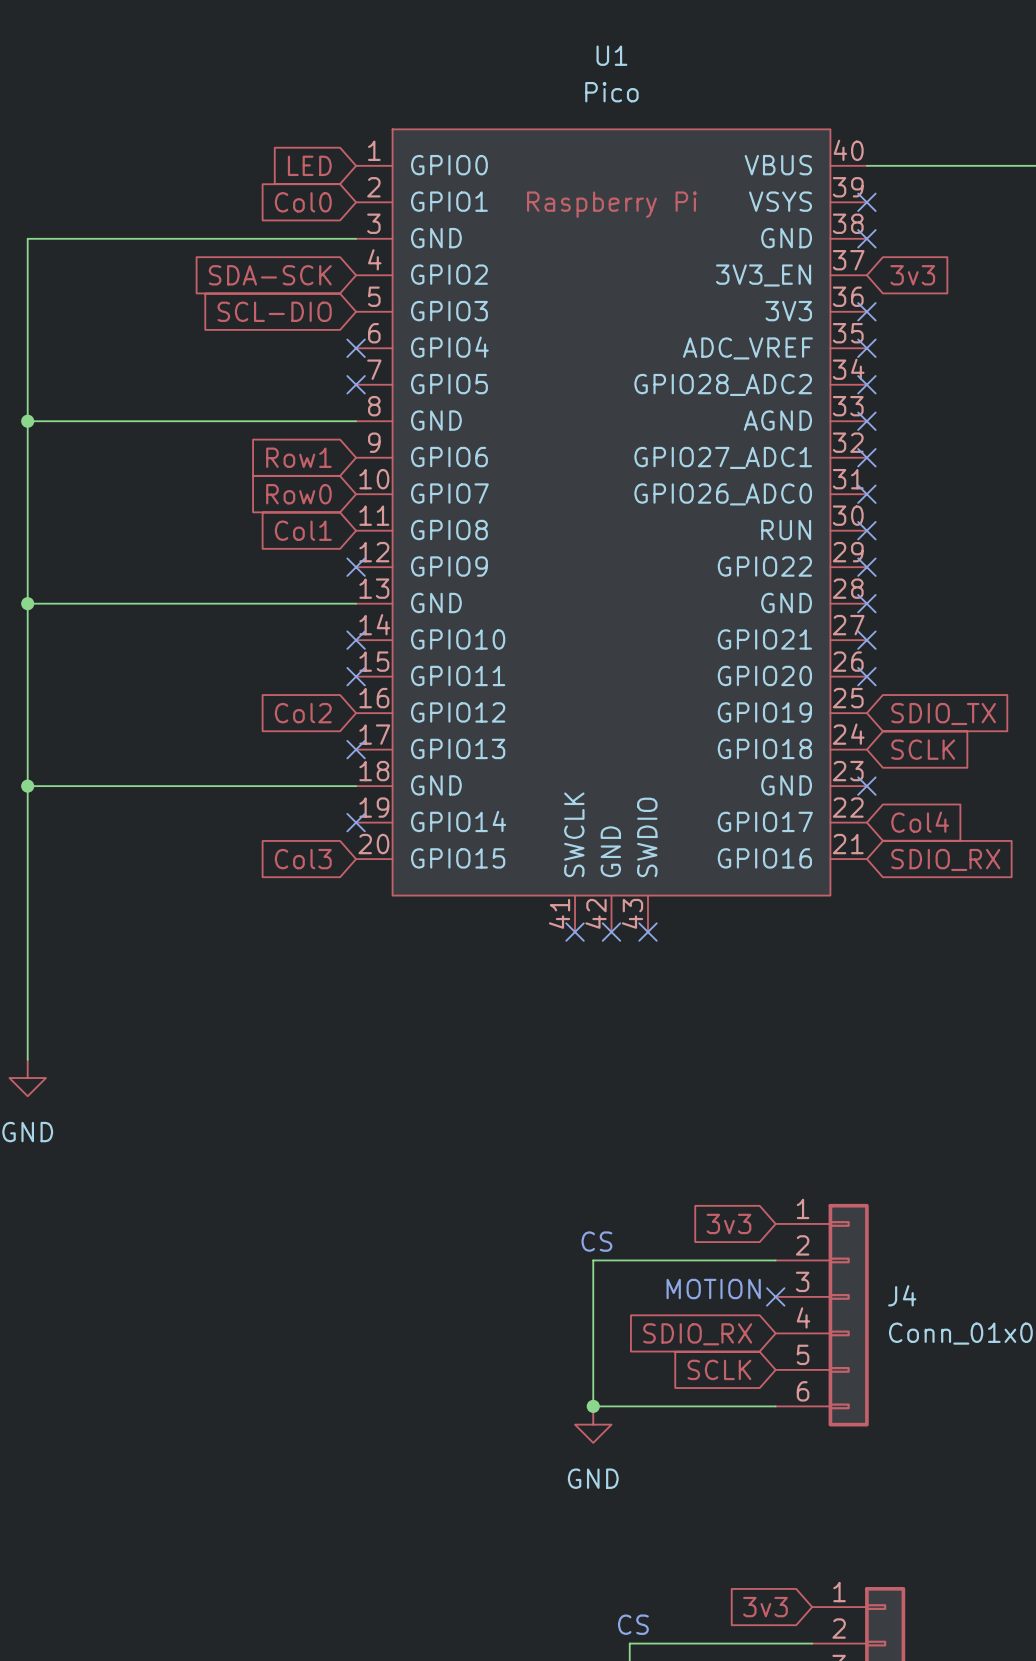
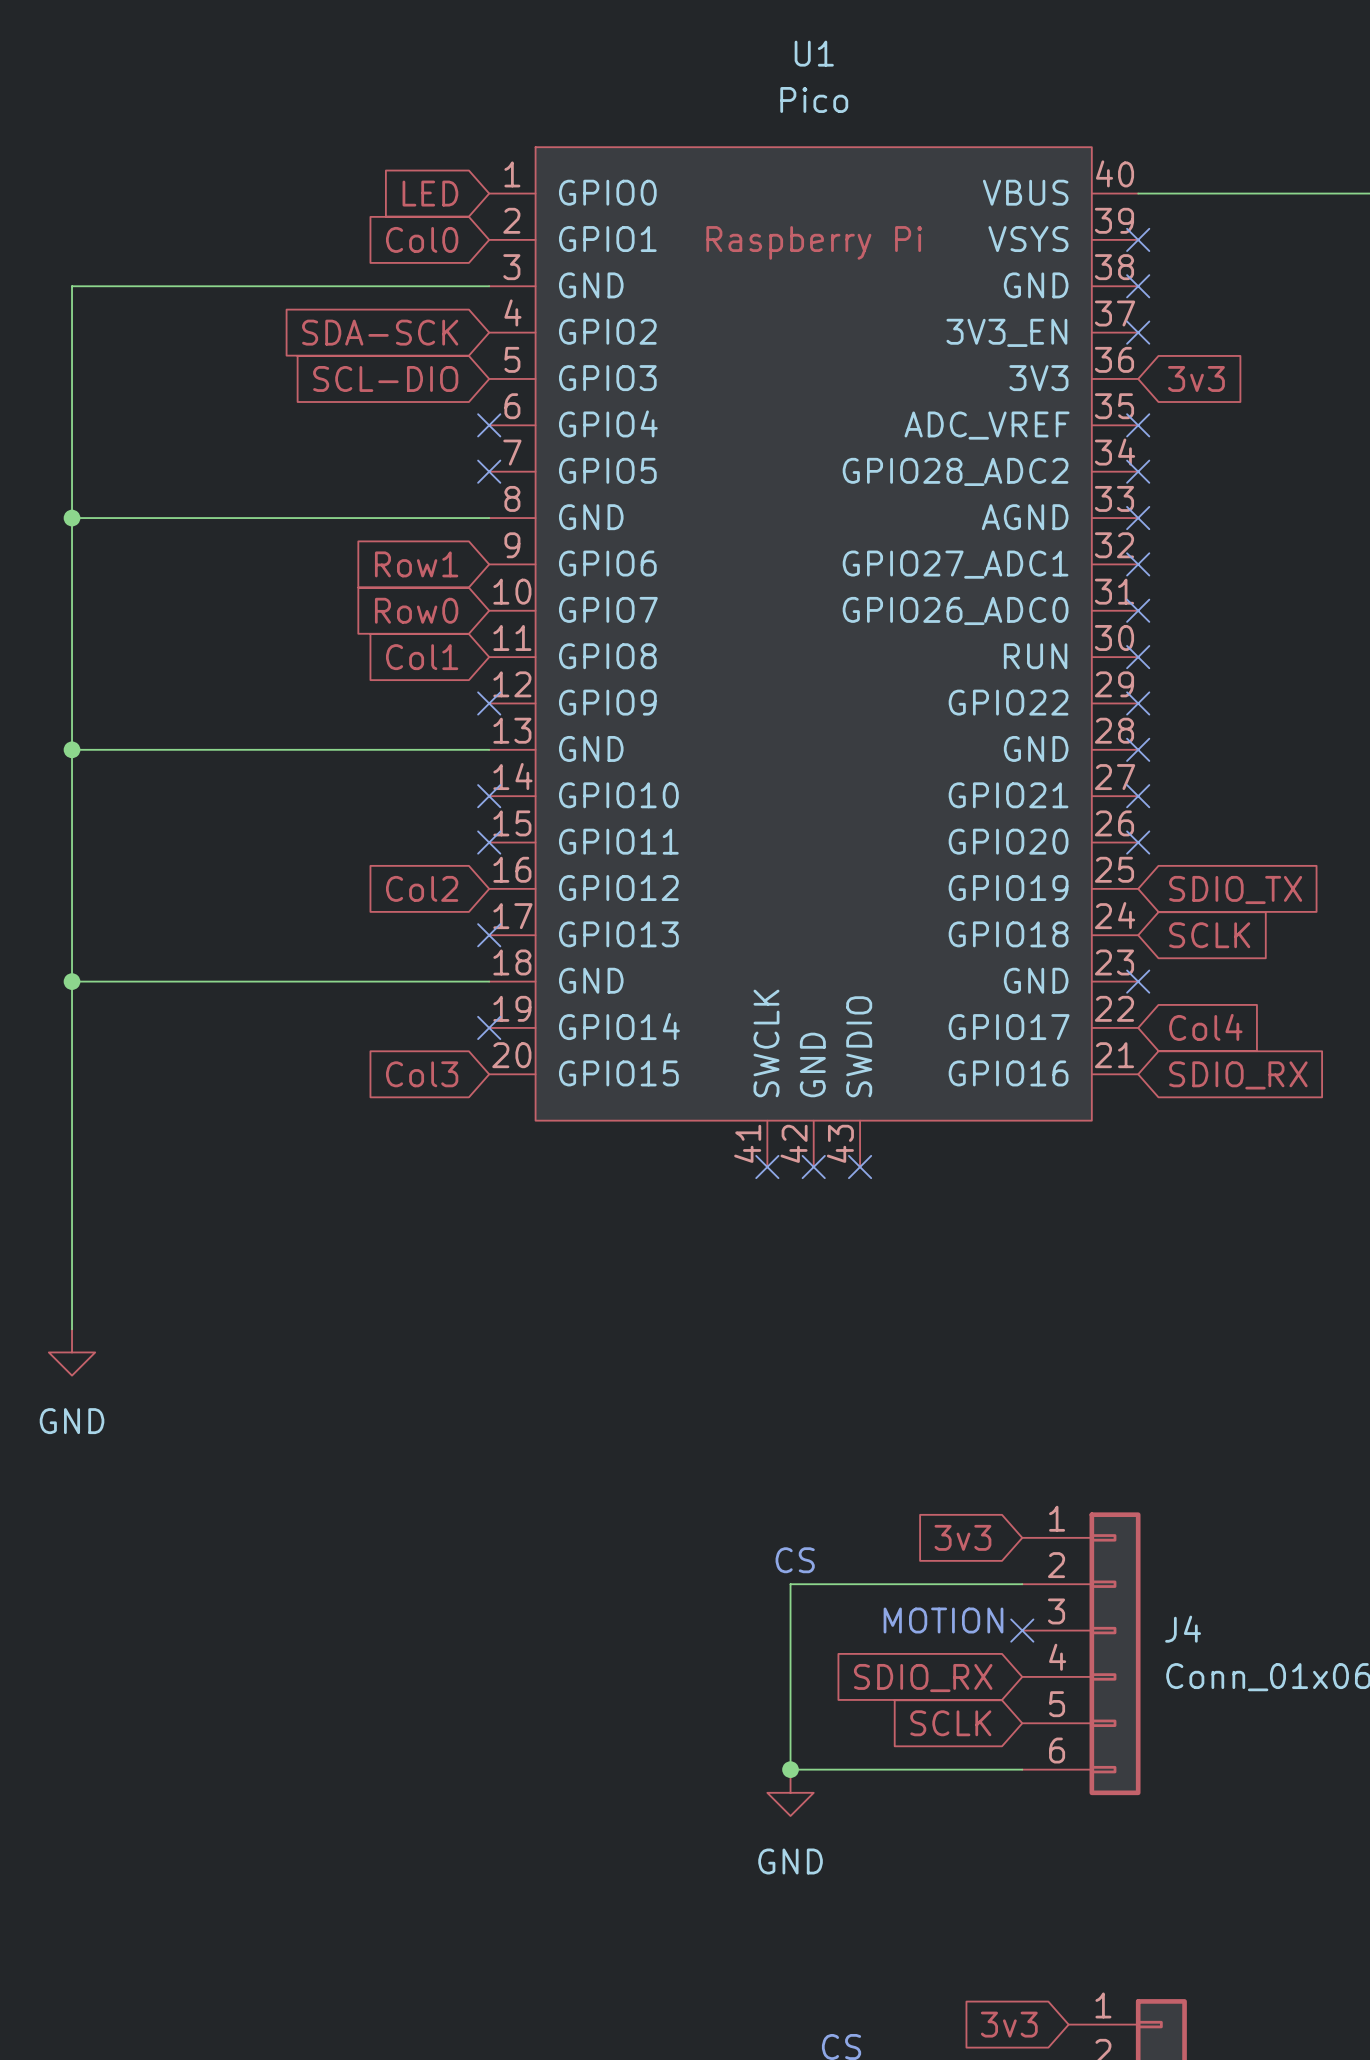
global label position: 3v3 (912, 275) -> 3v3 (1196, 378)
no-connect mark position: (866, 311) -> (1138, 332)

